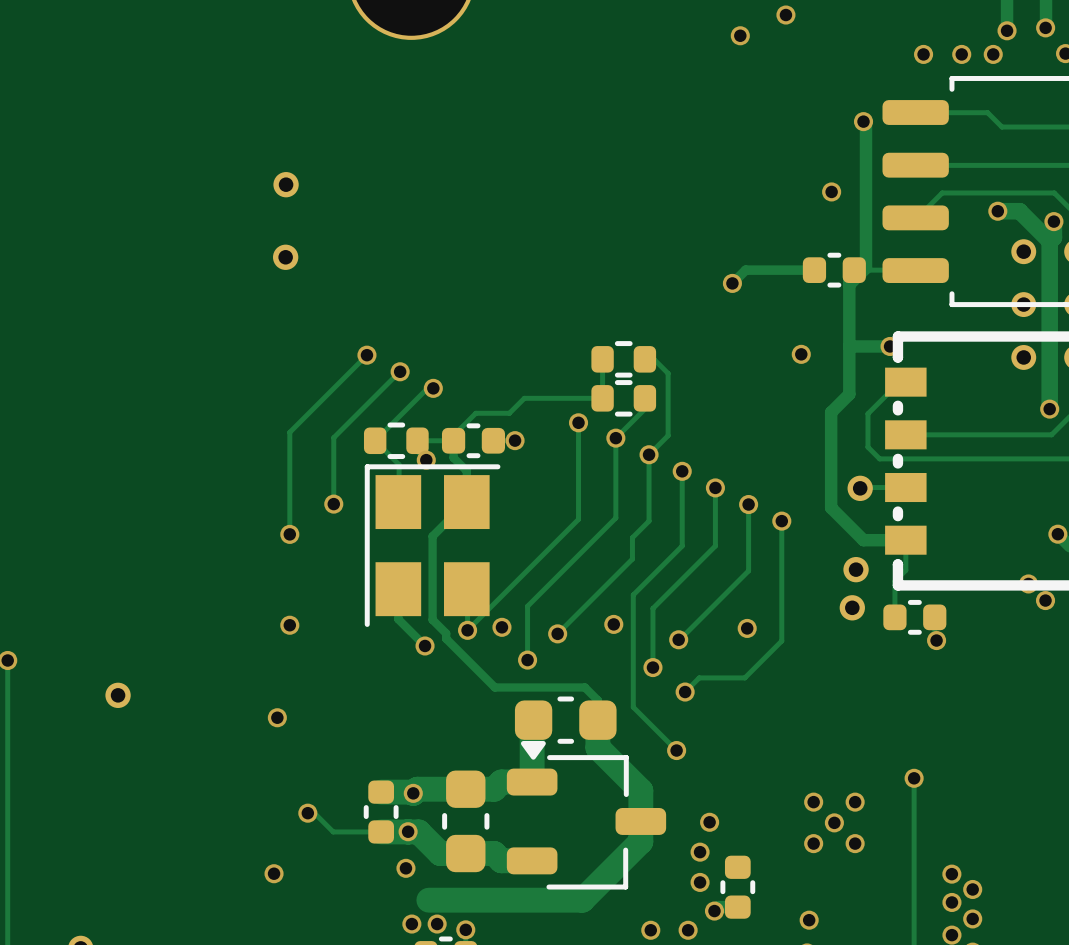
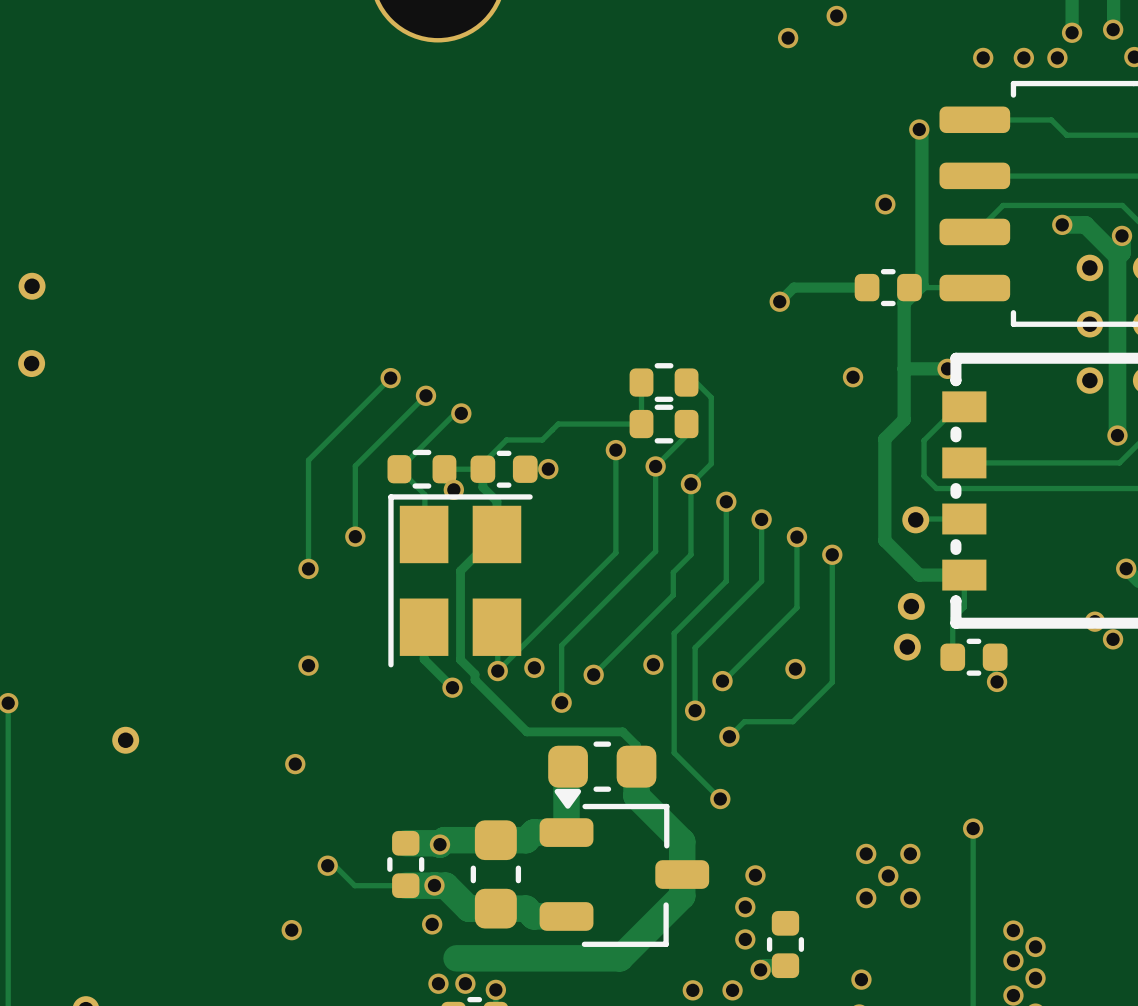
part: (286, 184) -> none
part: (285, 257) -> none
part: none -> (32, 286)
part: none -> (31, 363)

